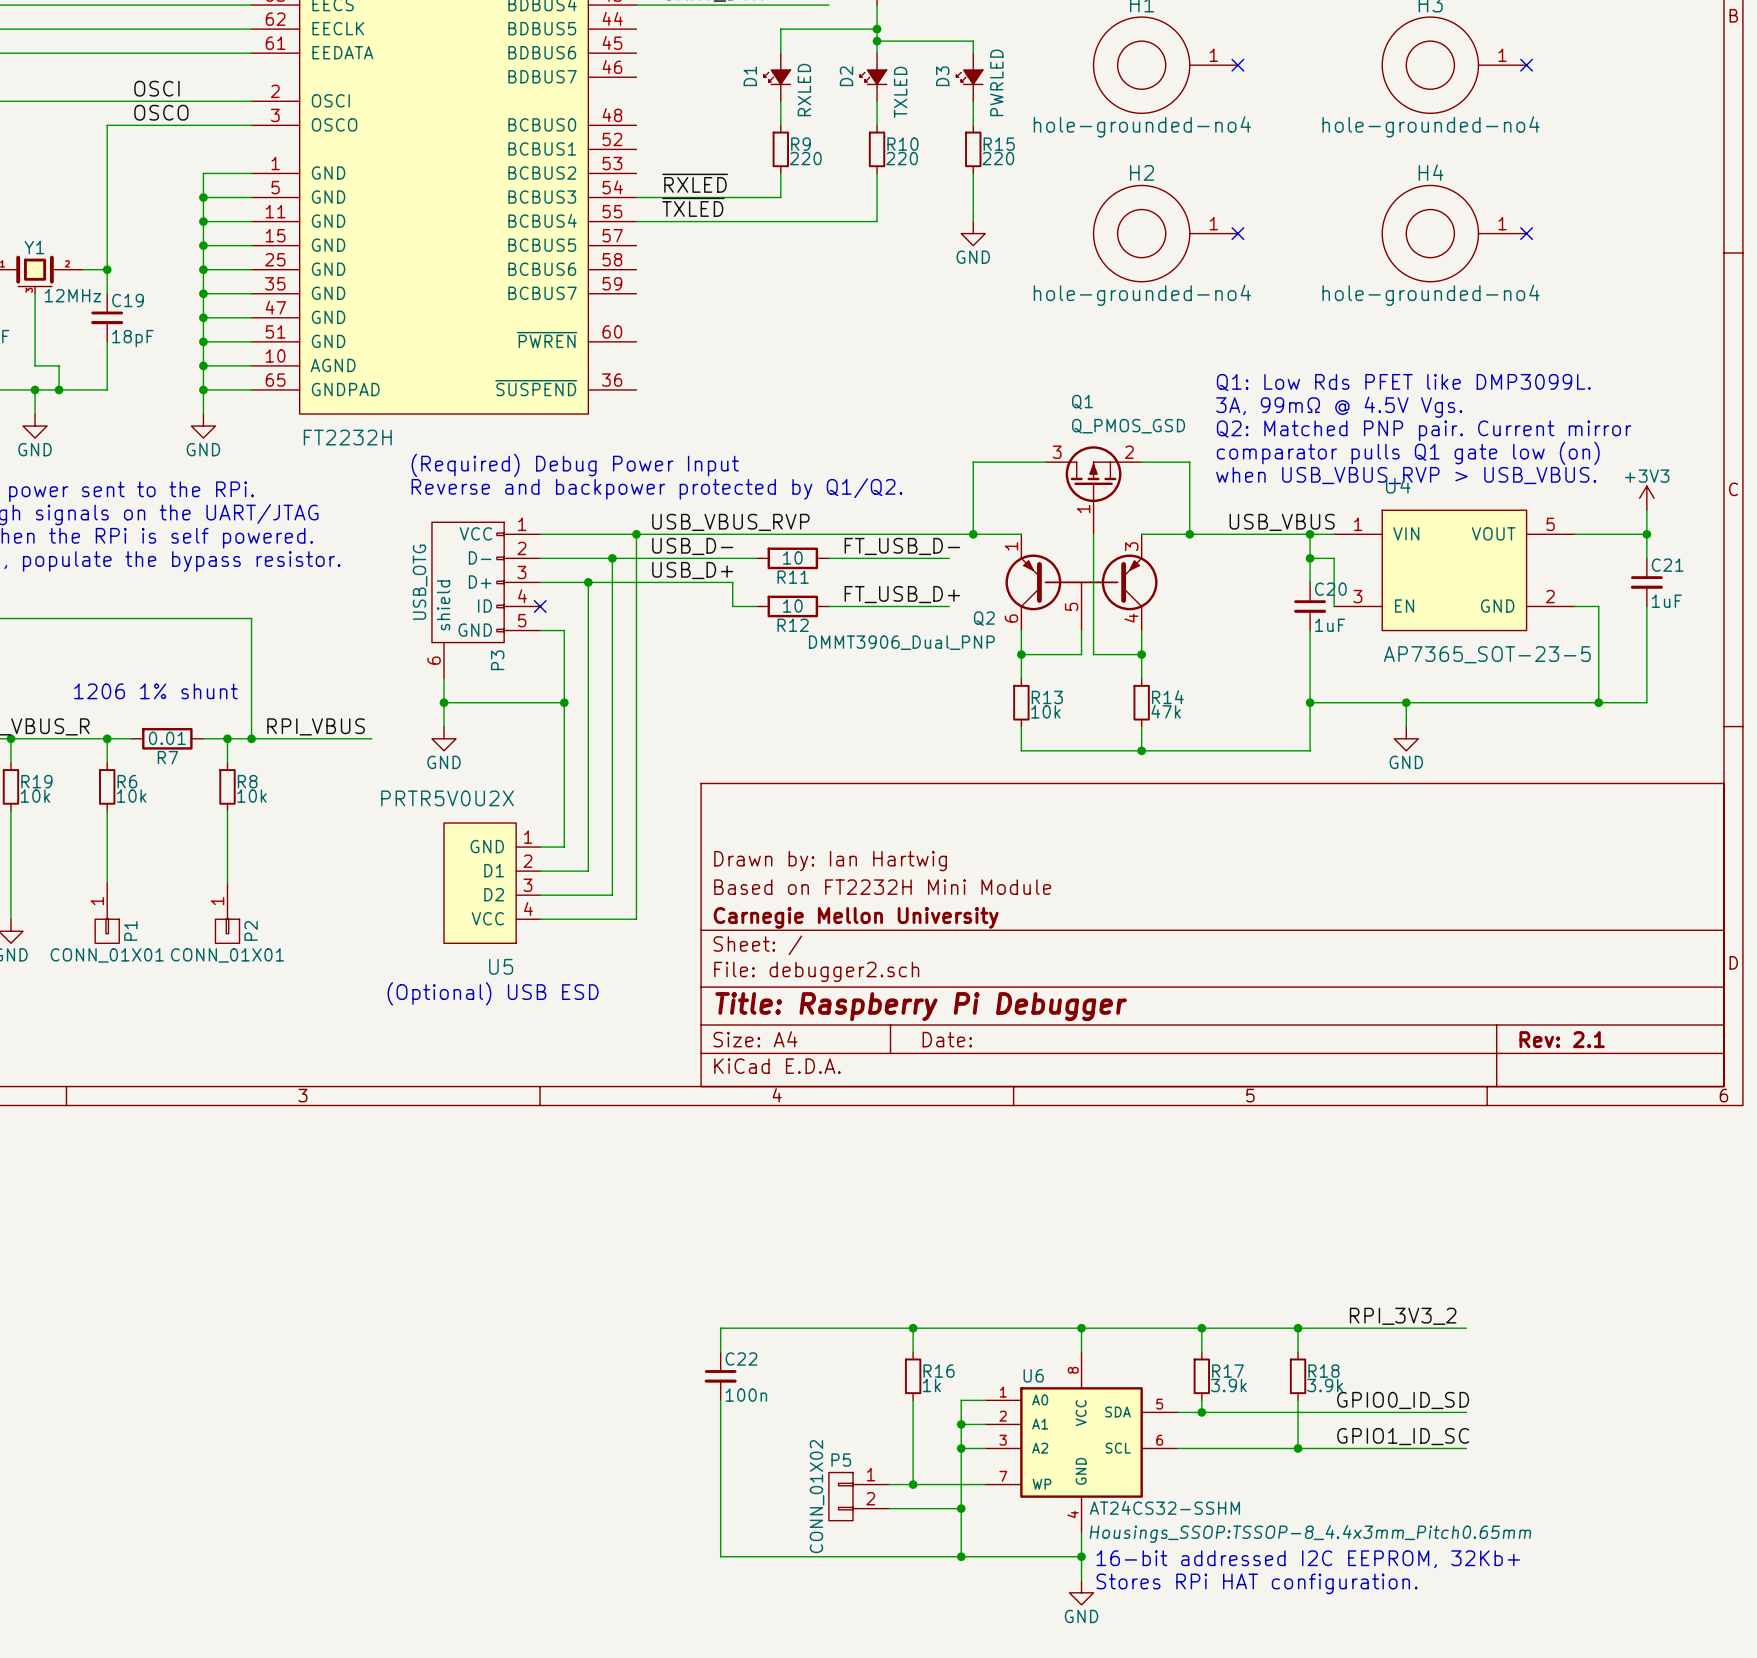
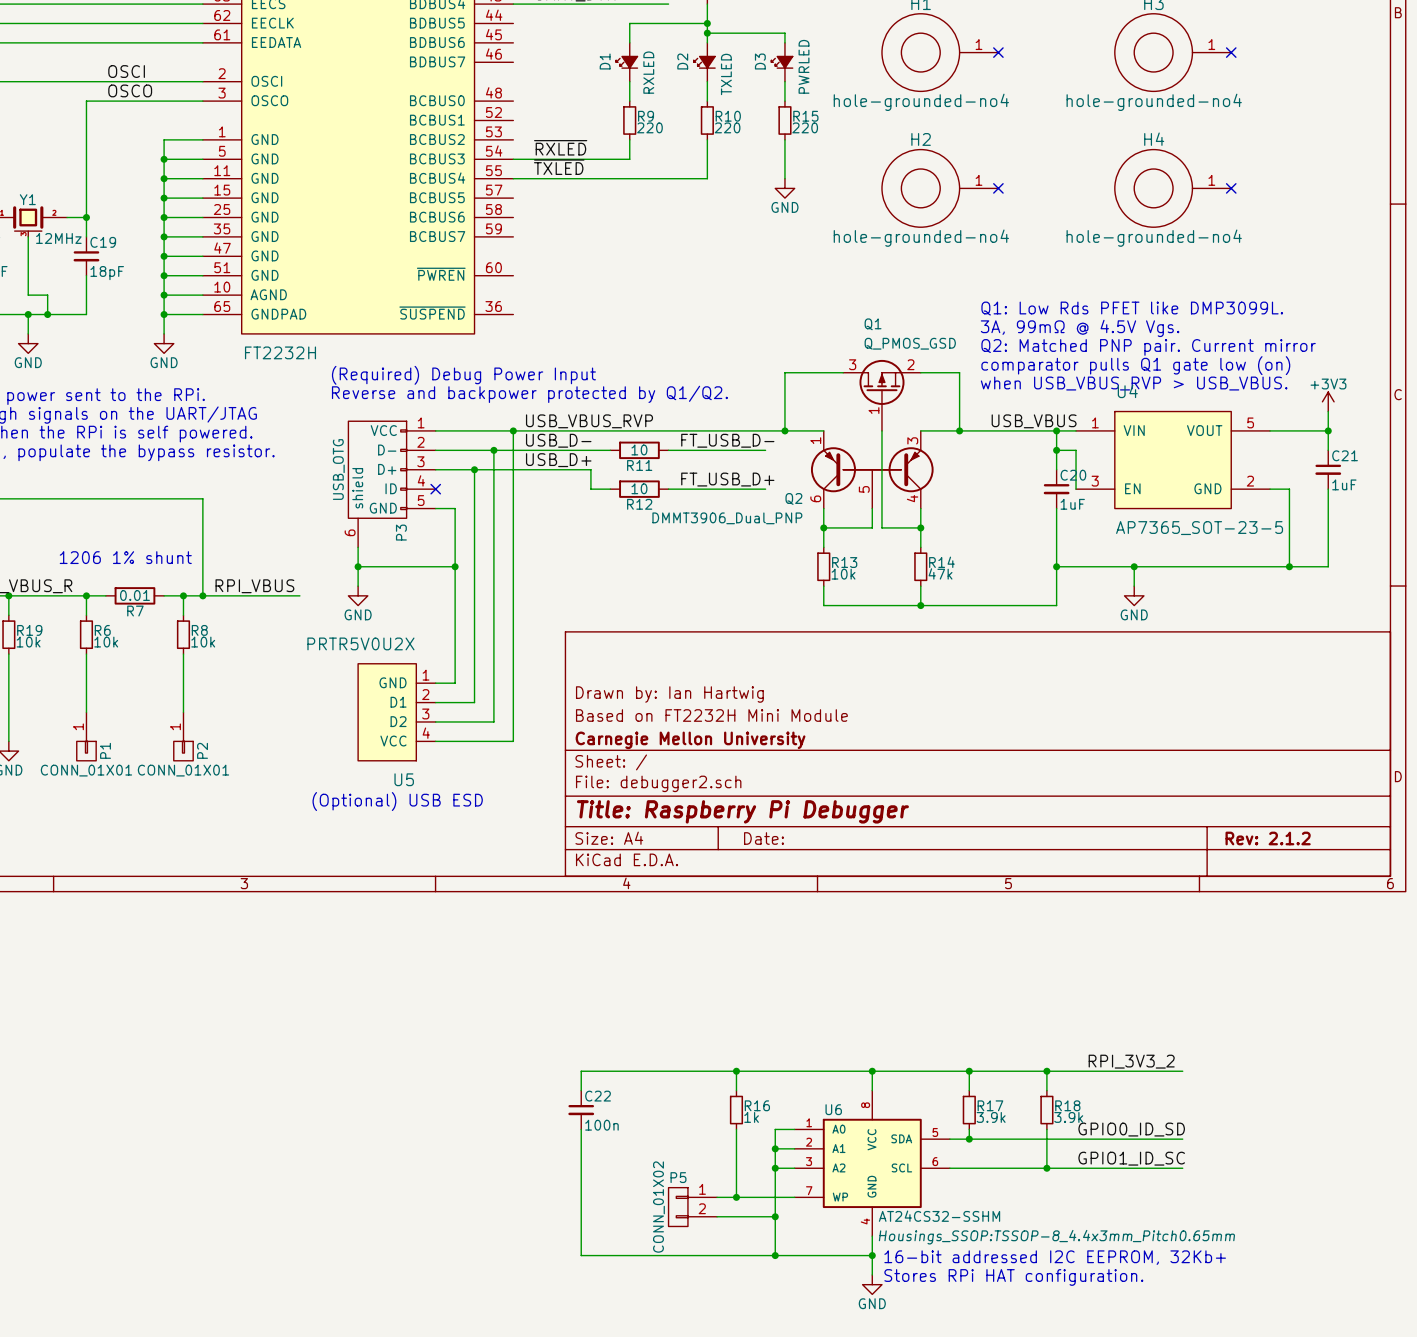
title block: Rev: 2.1 (1562, 1039) -> Rev: 2.1.2 (1268, 838)

